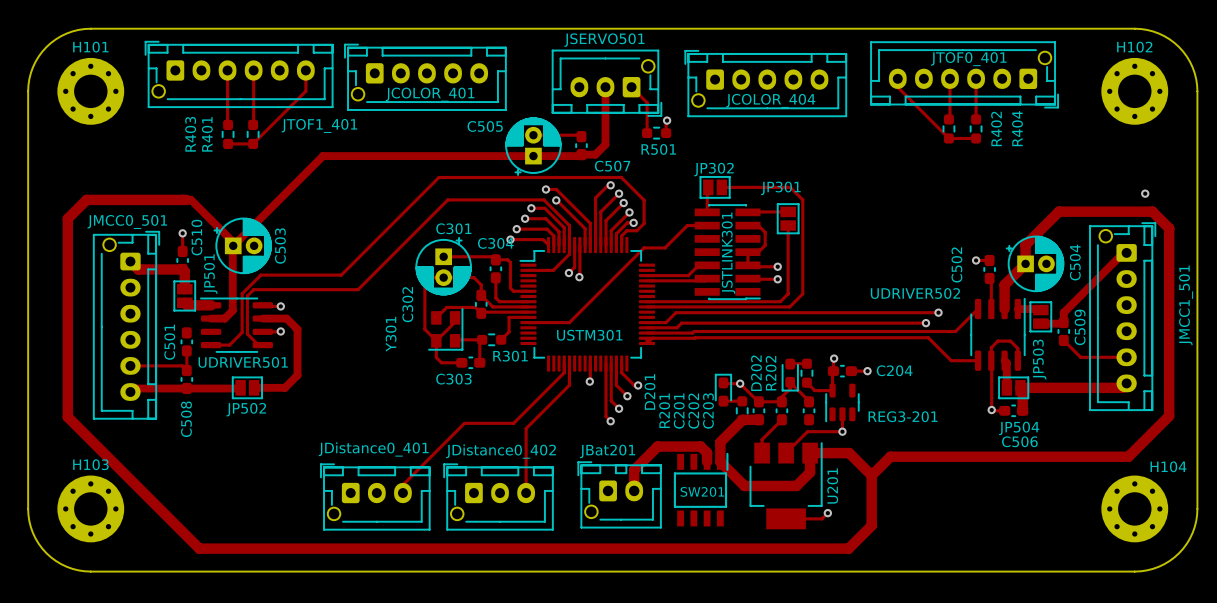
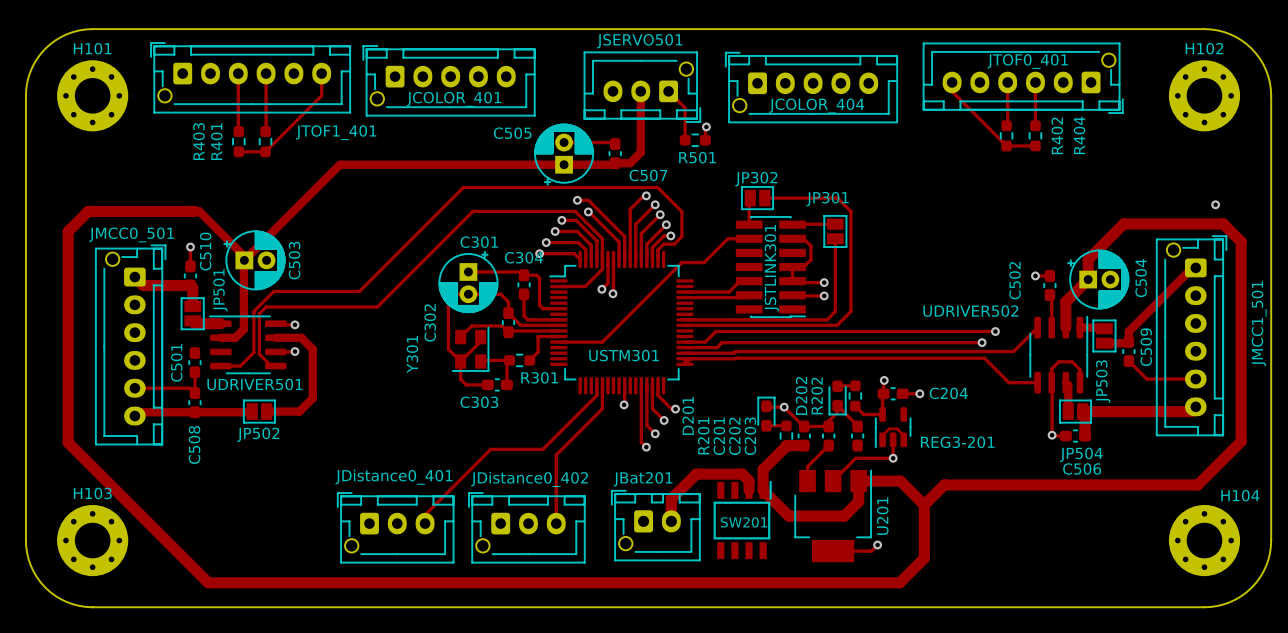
track: none -> (882, 439) (882, 435) (889, 428) (897, 428) (903, 435) (903, 439)

